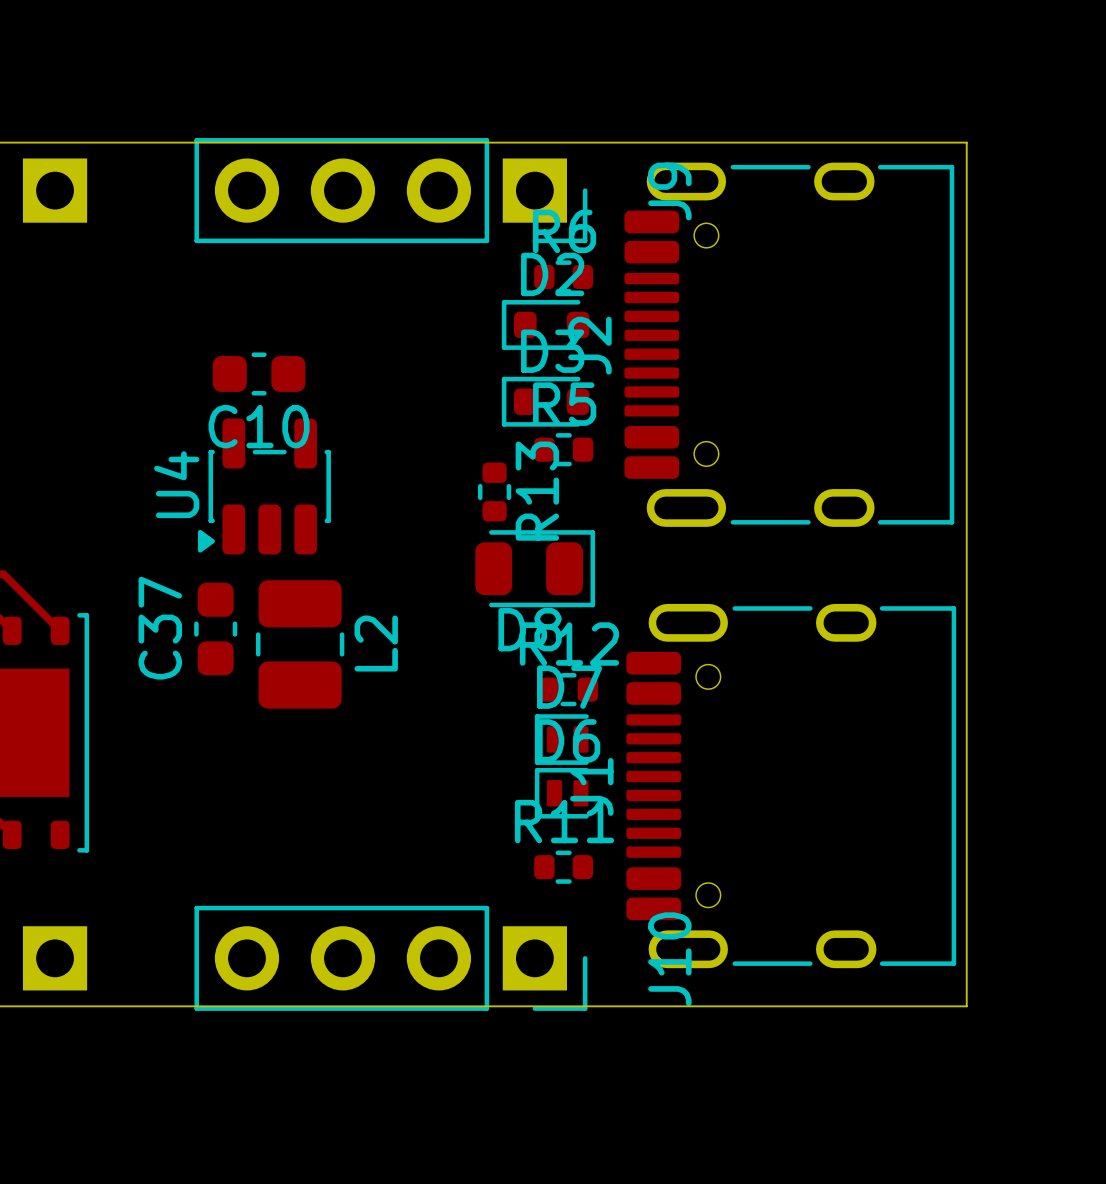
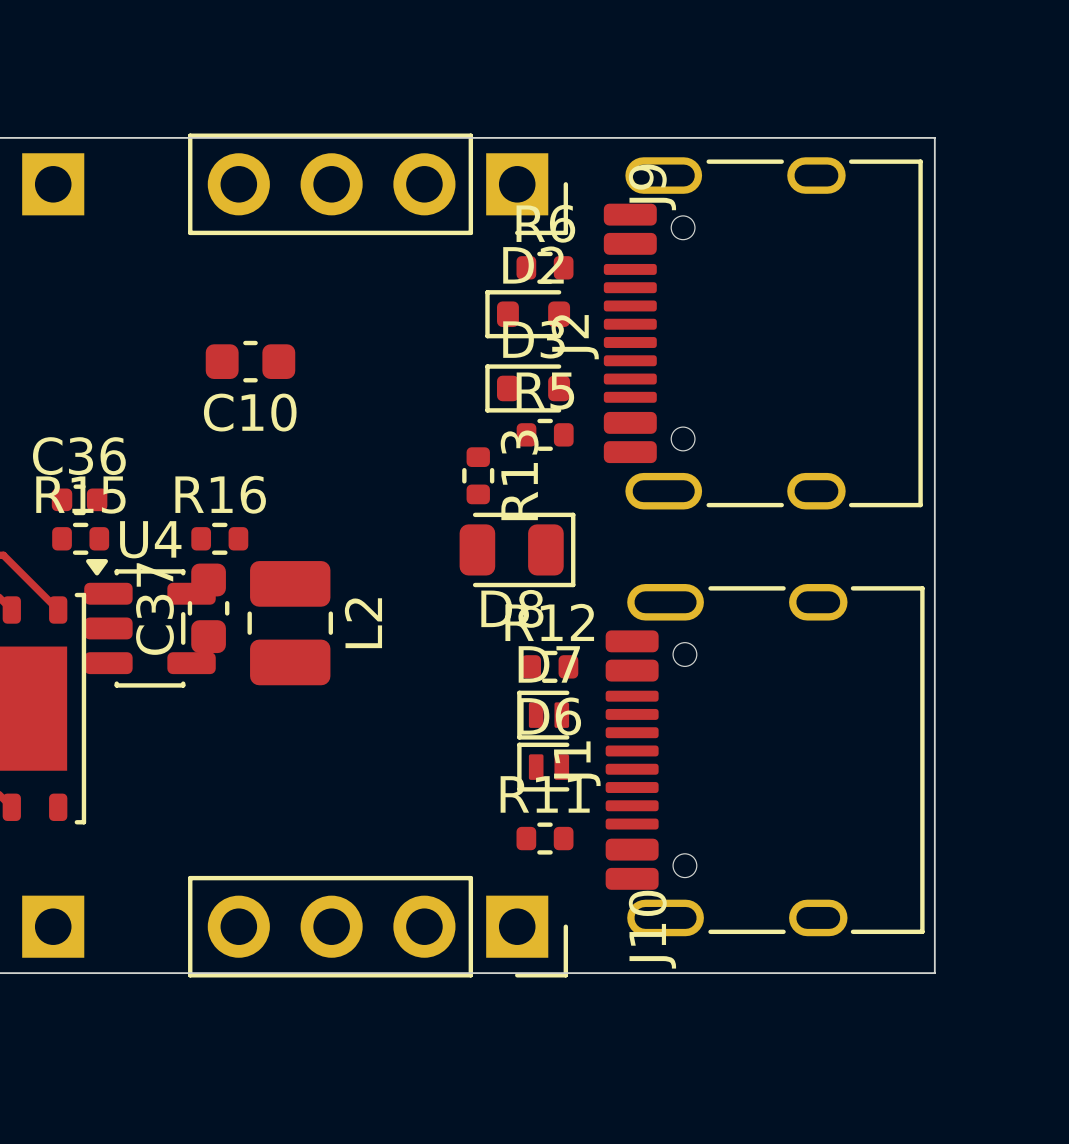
U4 rotation: 0° (264, 486) -> 90° clockwise (149, 623)
U4 position: (264, 486) -> (149, 623)
C36: none -> (79, 499)
R15: none -> (80, 538)
R16: none -> (219, 538)

